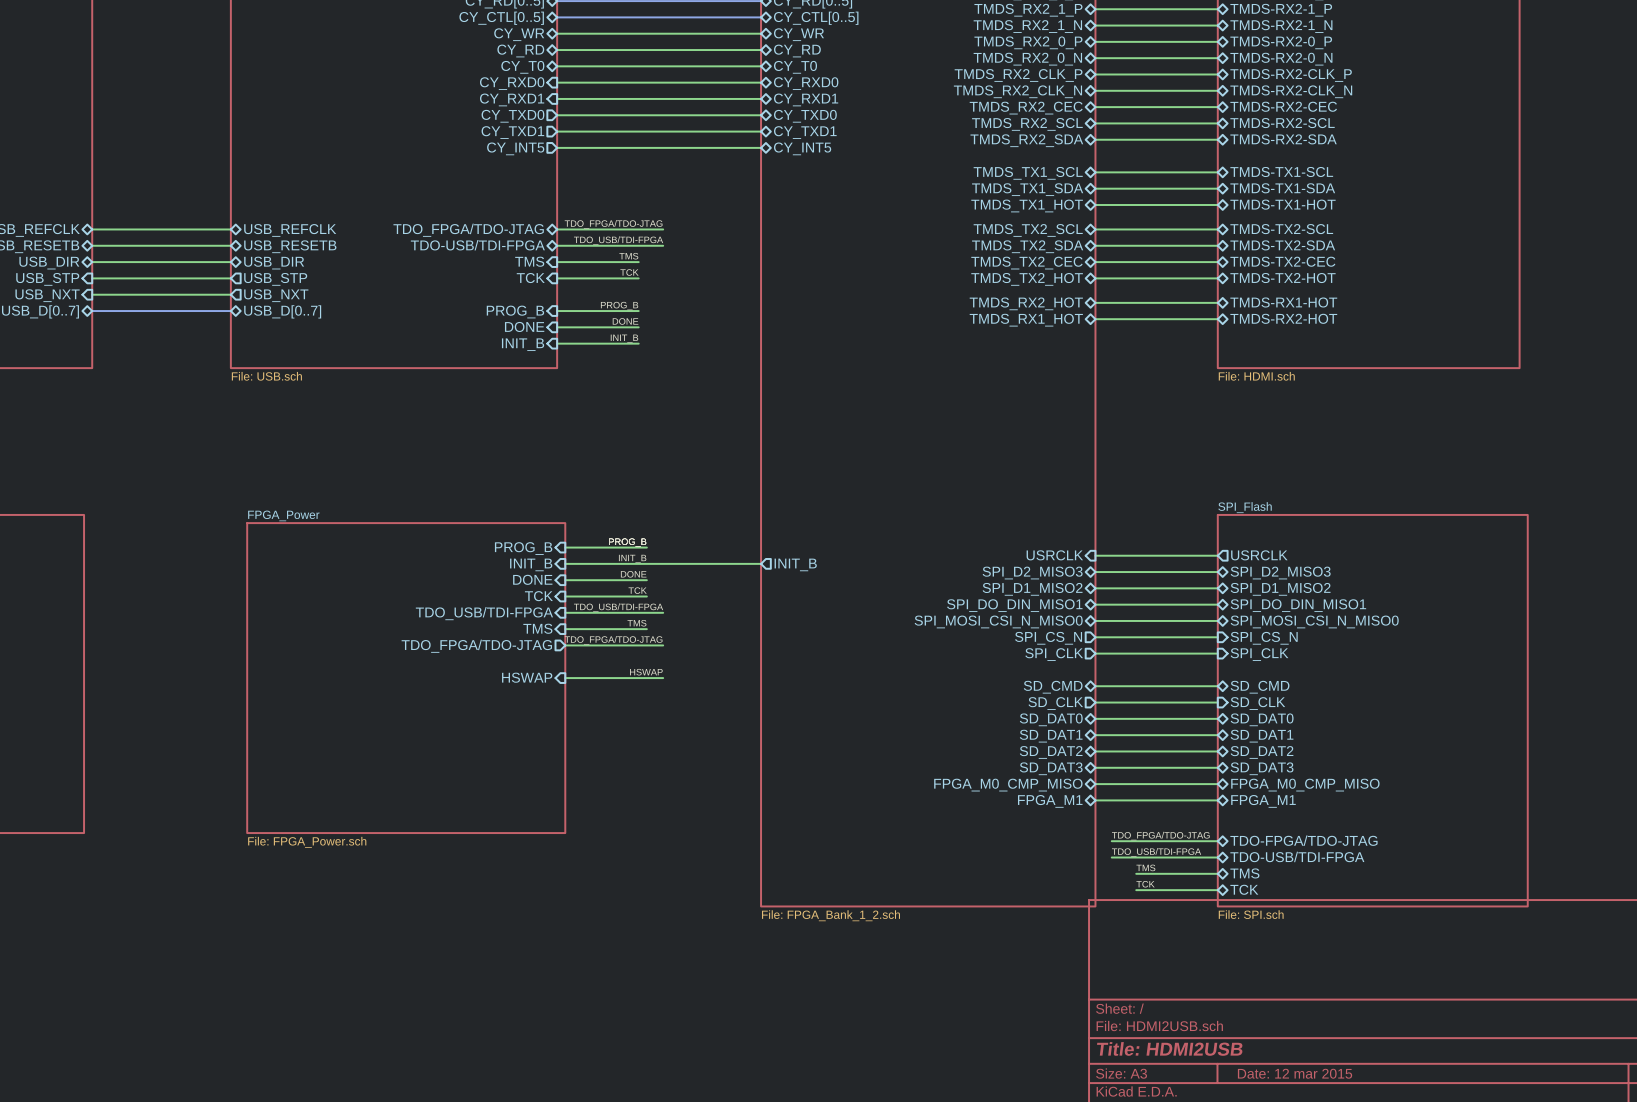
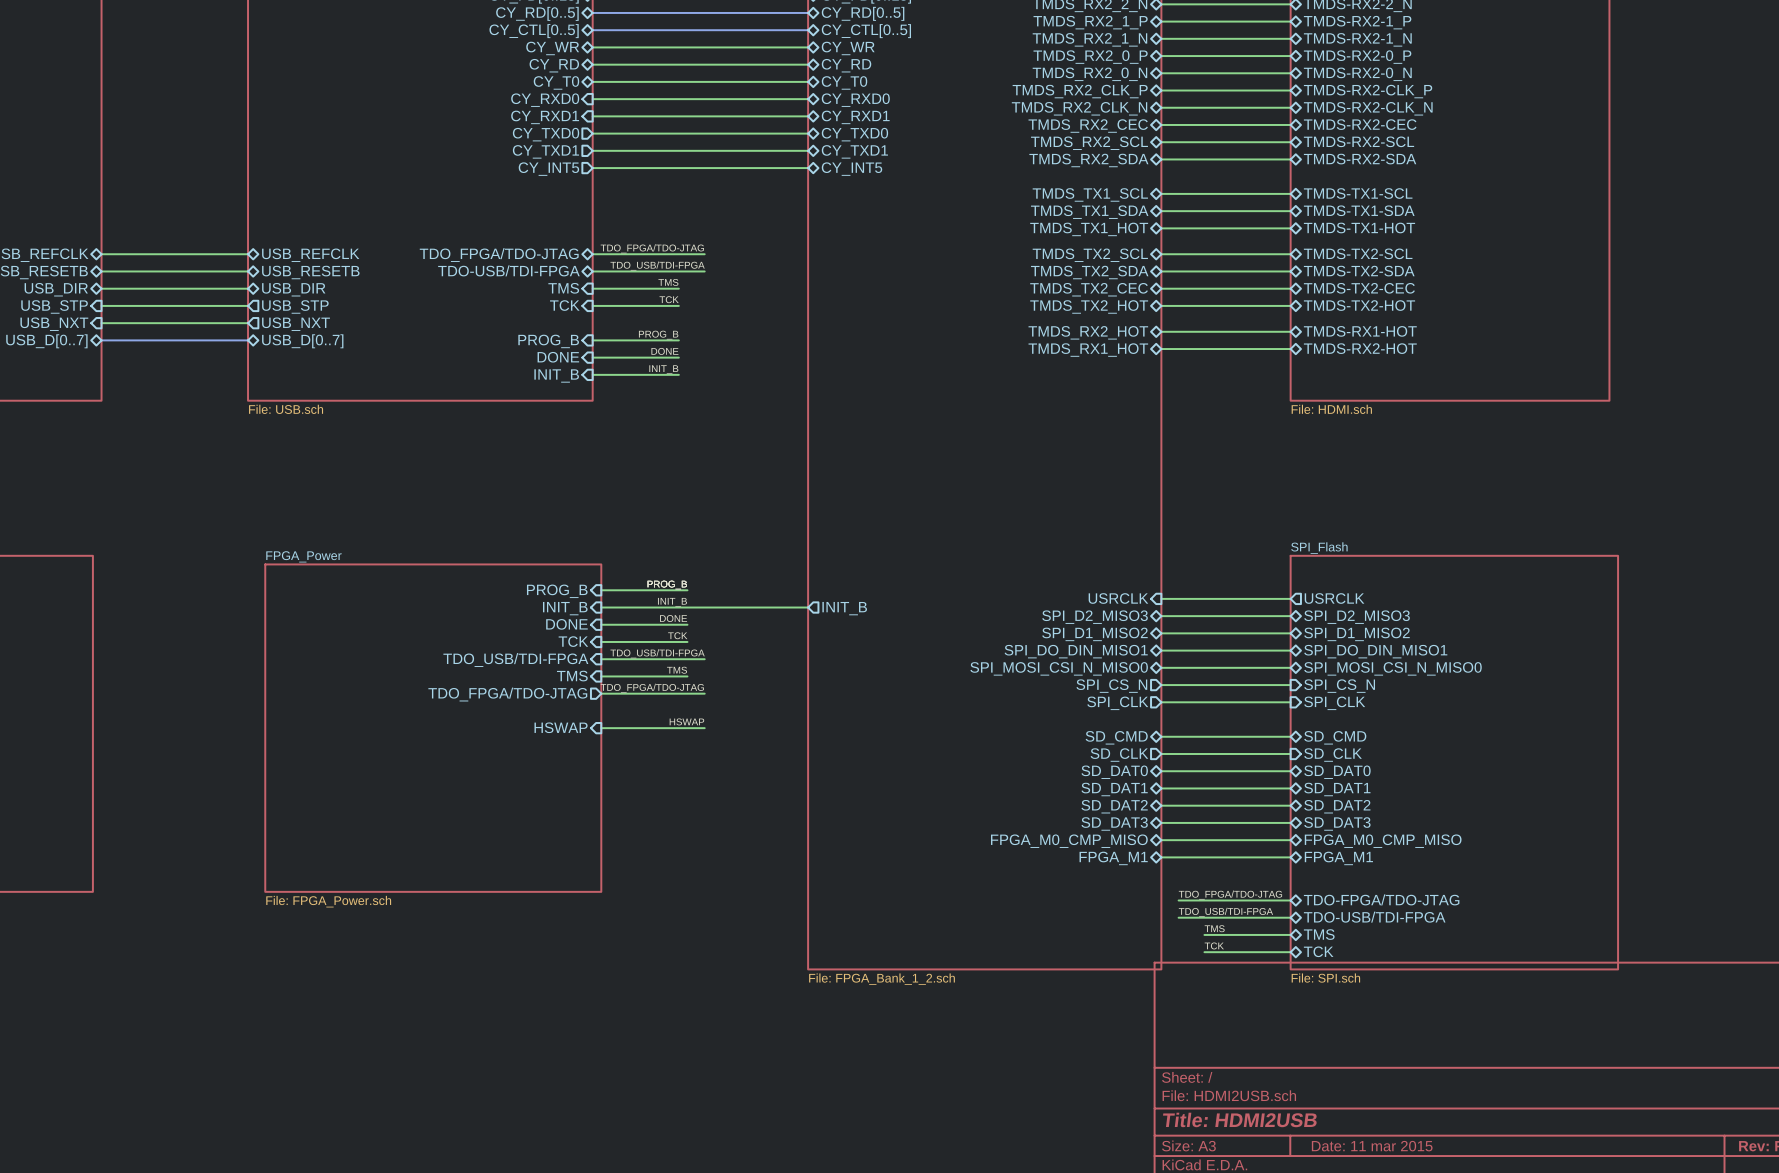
title block: Date: 12 mar 2015 (1295, 1073) -> Date: 11 mar 2015 (1372, 1146)

